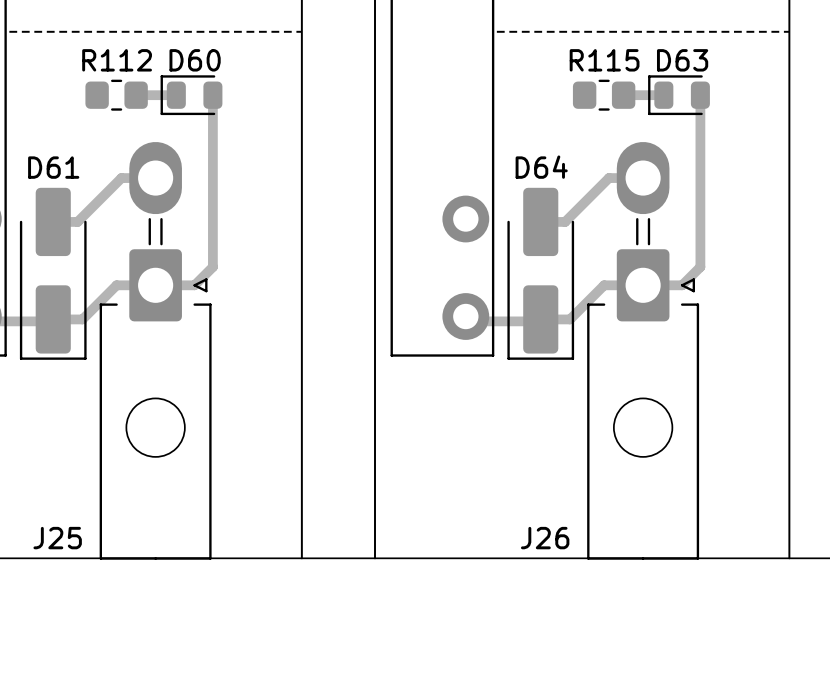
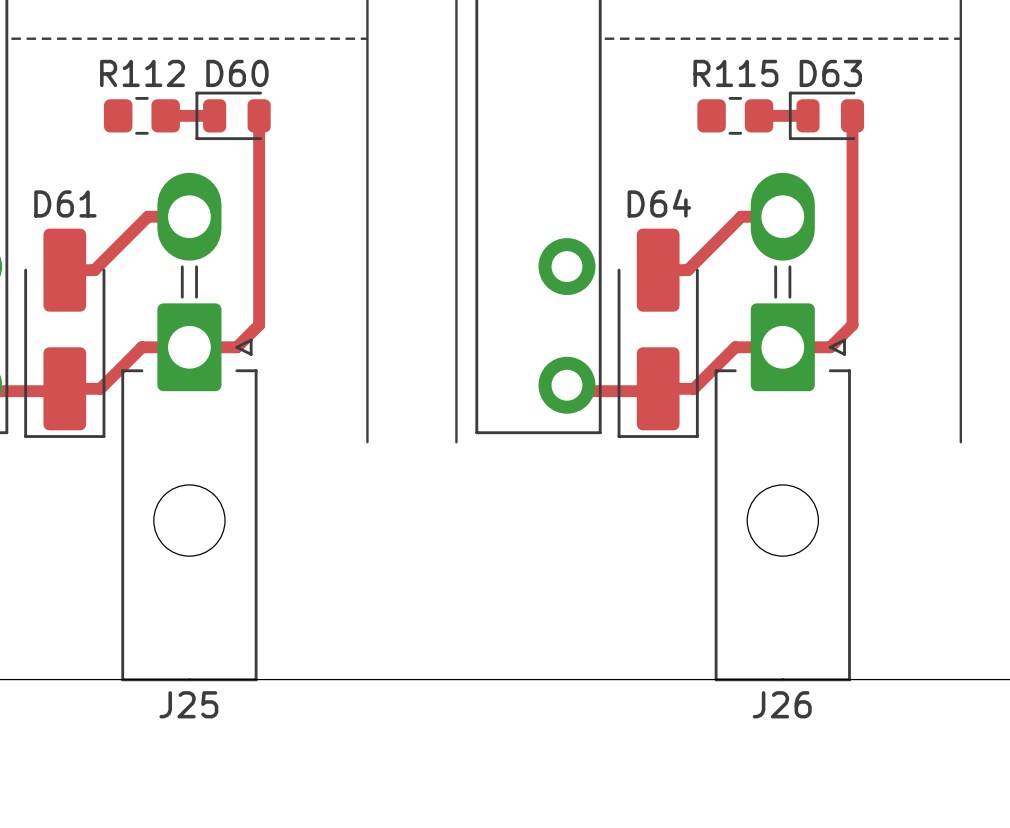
line: (301, 363) (301, 558) -> none
line: (375, 363) (375, 558) -> none
line: (789, 363) (789, 558) -> none
J25 name position: J25 (57, 538) -> J25 (188, 704)
J26 name position: J26 (545, 538) -> J26 (782, 704)

